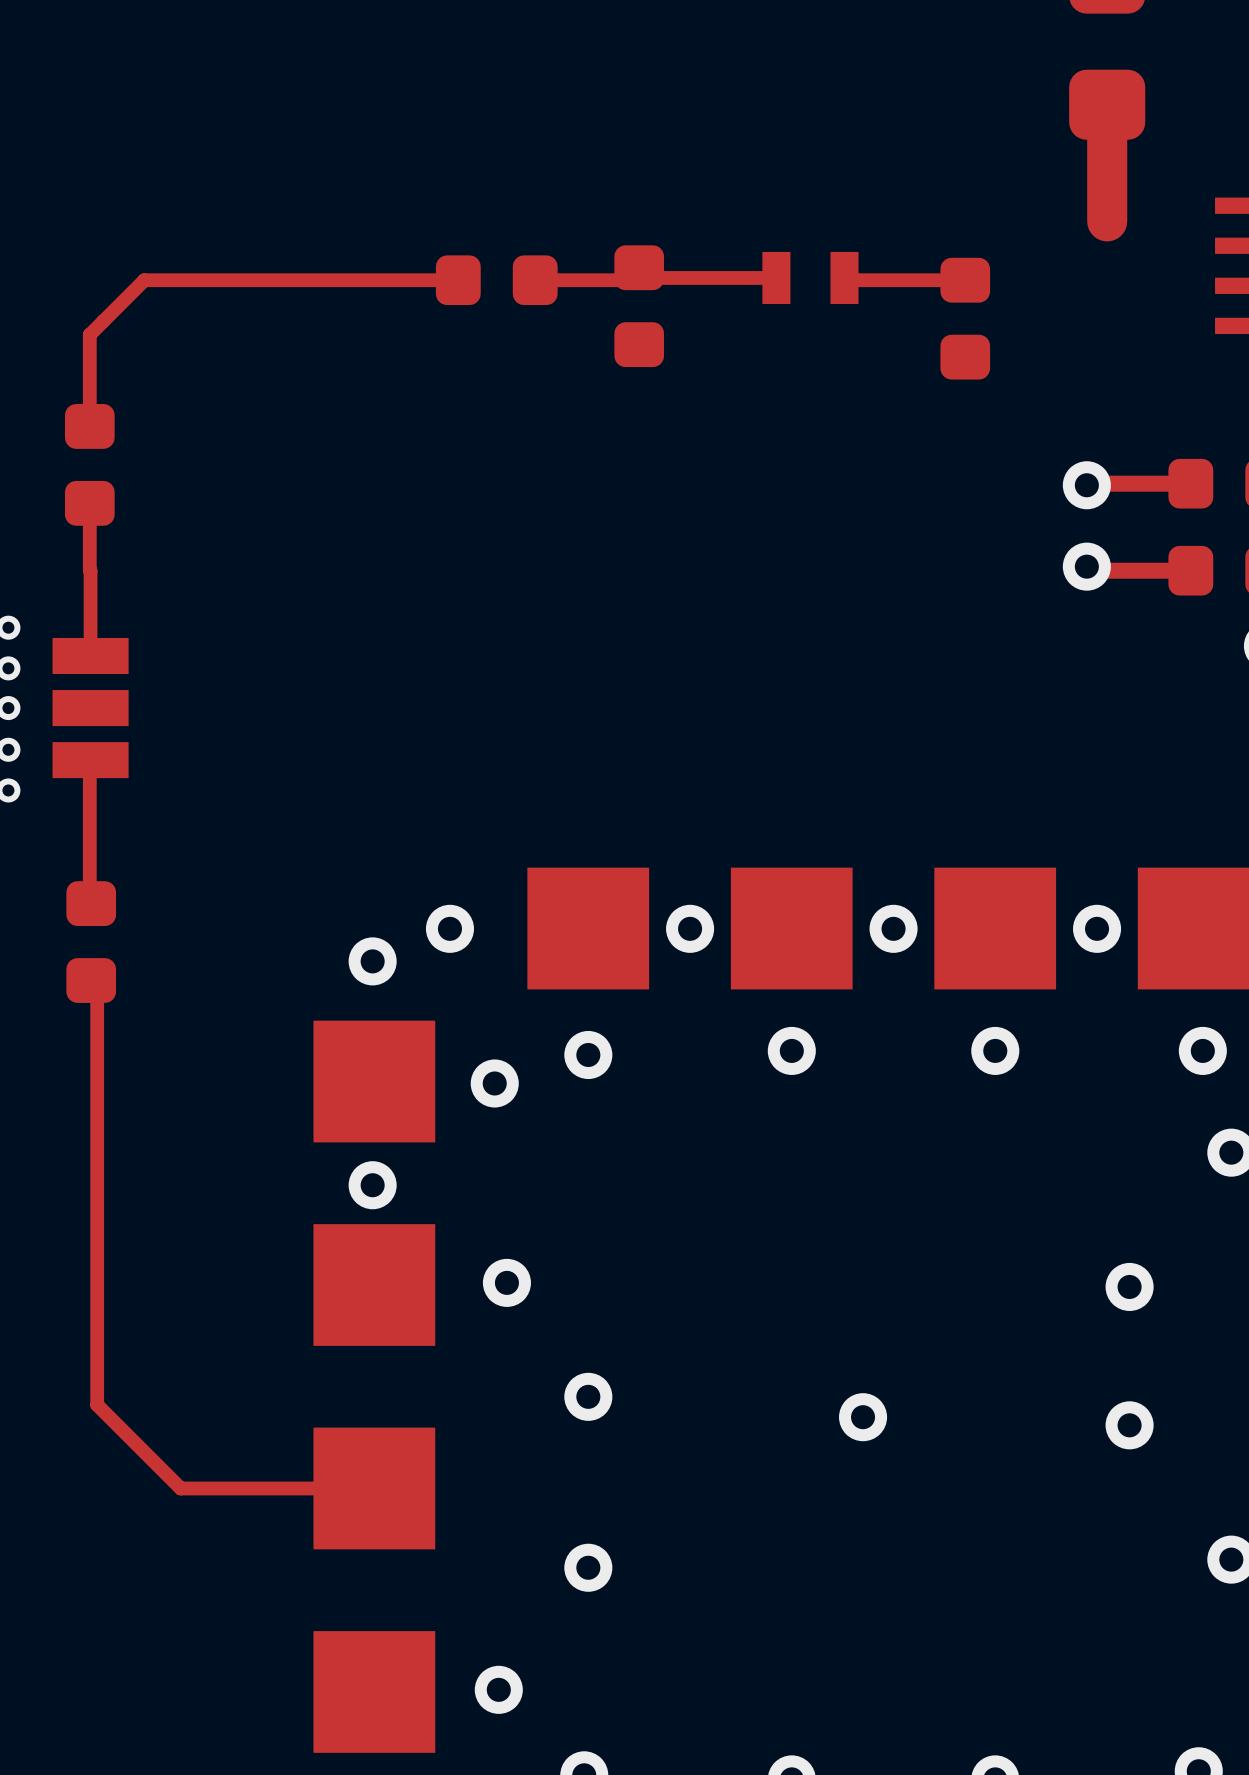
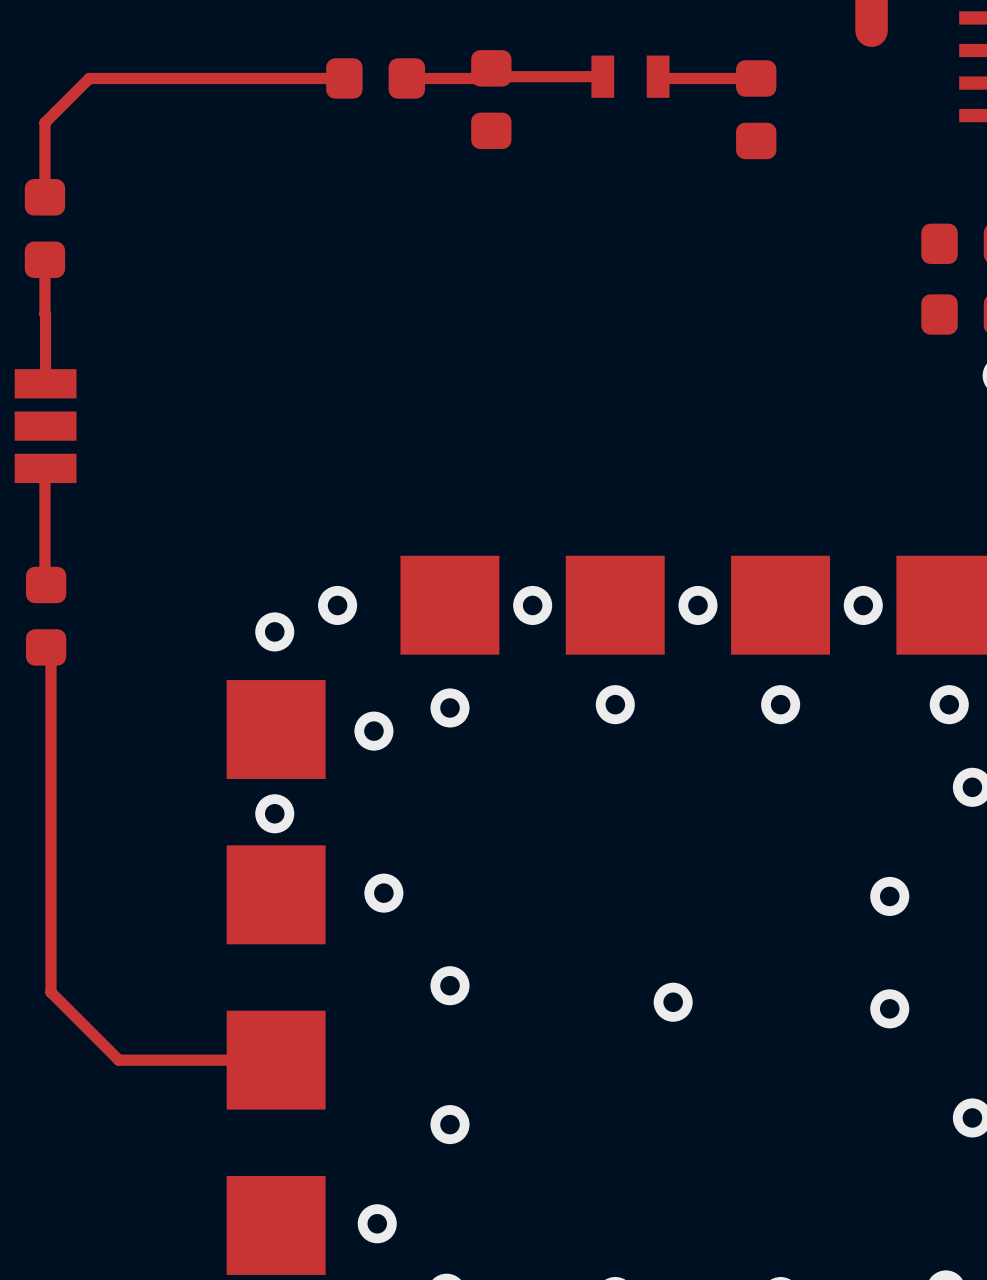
top track: (1190, 483) (1088, 483) (1086, 485) -> none
via: (1086, 485) -> none
top track: (1086, 566) (1090, 570) (1190, 570) -> none
via: (1086, 566) -> none

